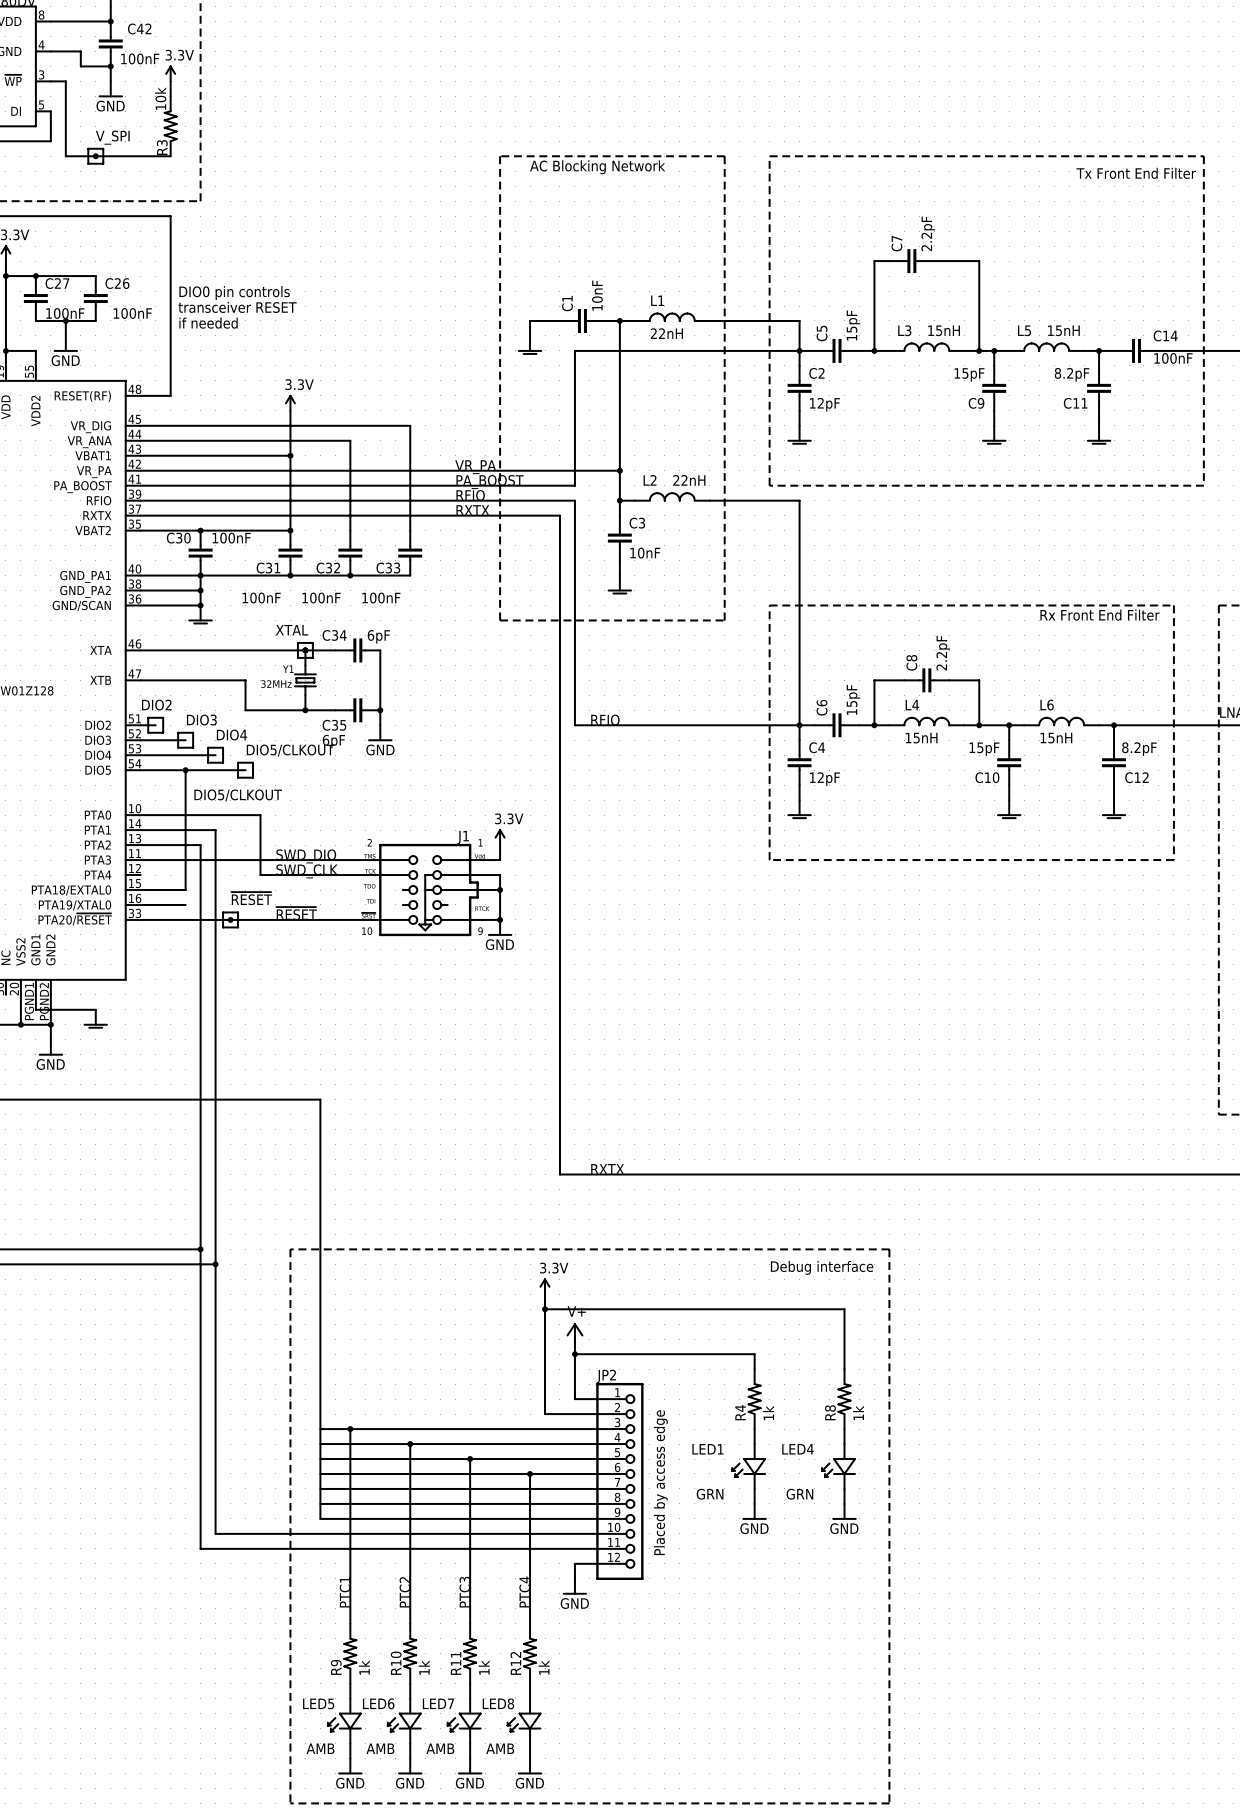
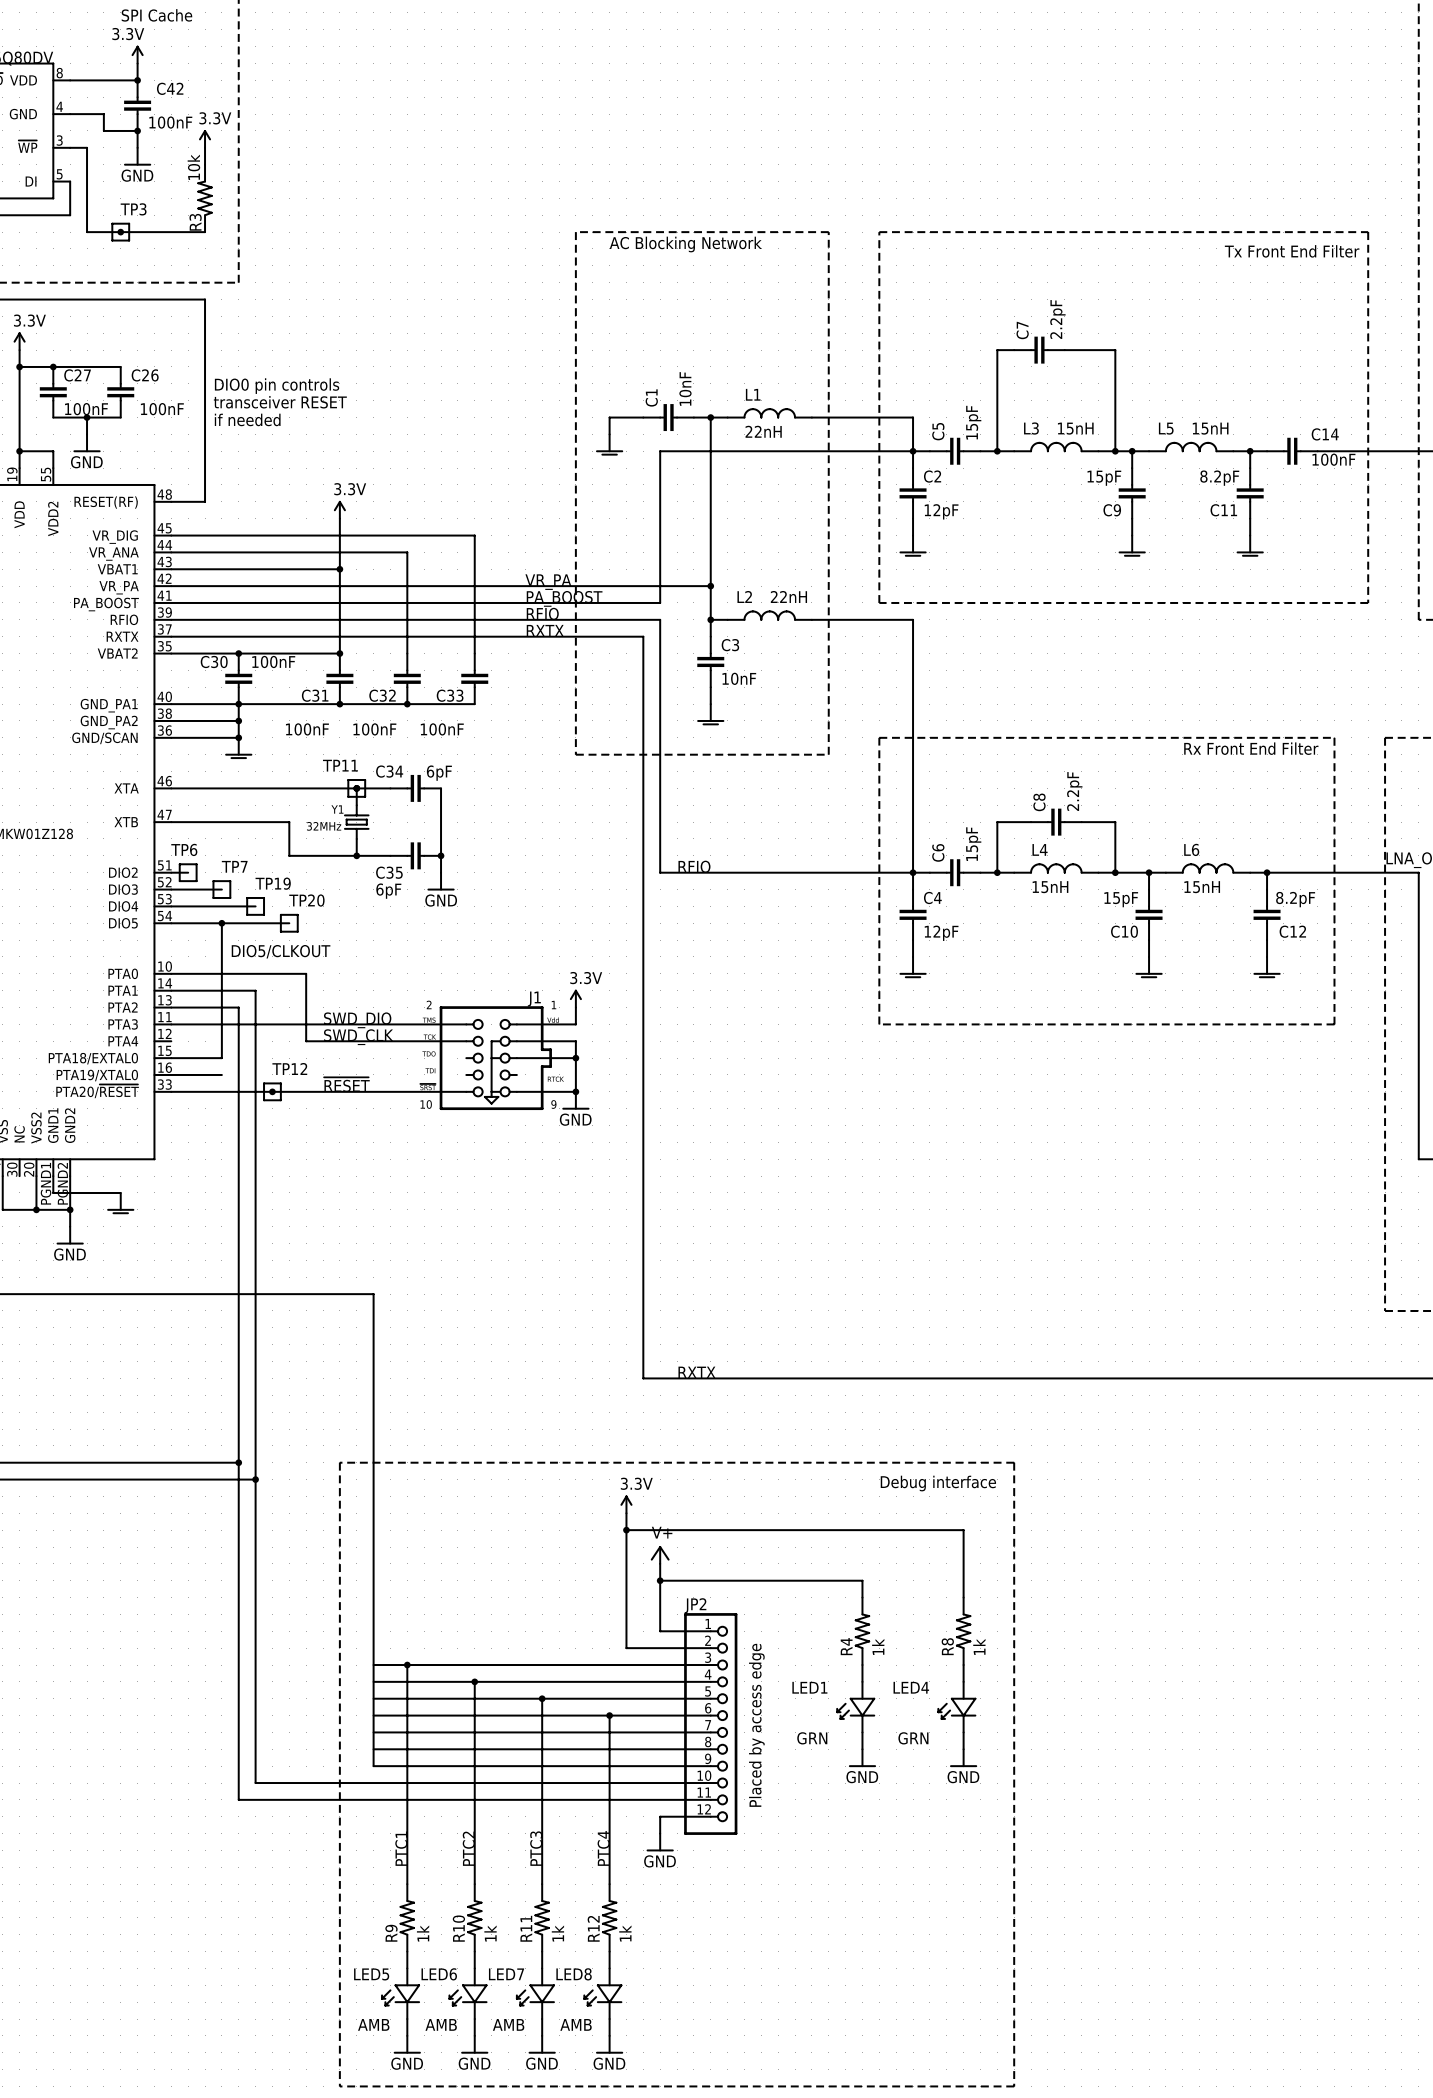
V_SPI name: V_SPI (112, 137) -> TP3 (133, 209)
XTAL name: XTAL (292, 630) -> TP11 (340, 765)
DIO2 name: DIO2 (156, 705) -> TP6 (184, 849)
DIO3 name: DIO3 (201, 720) -> TP7 (234, 866)
DIO4 name: DIO4 (231, 735) -> TP19 (273, 883)
DIO5/CLKOUT name: DIO5/CLKOUT (290, 750) -> TP20 (306, 900)
~{RESET} name: ~{RESET} (251, 898) -> TP12 (289, 1068)

